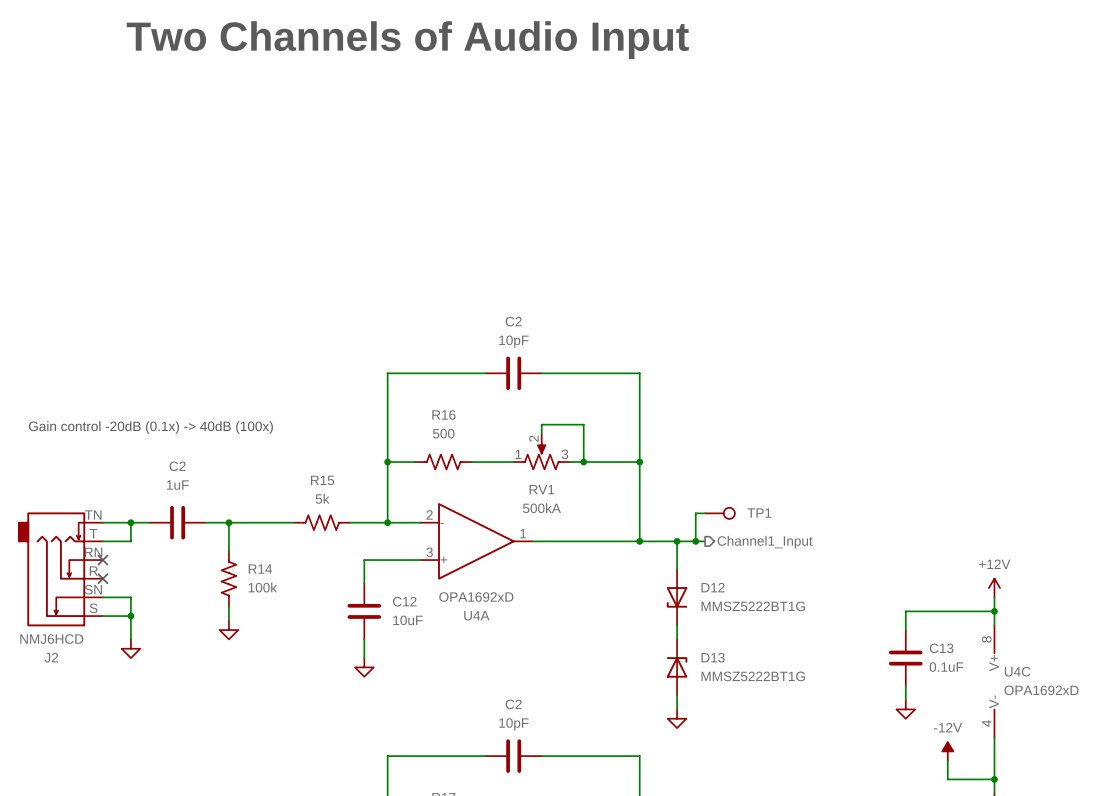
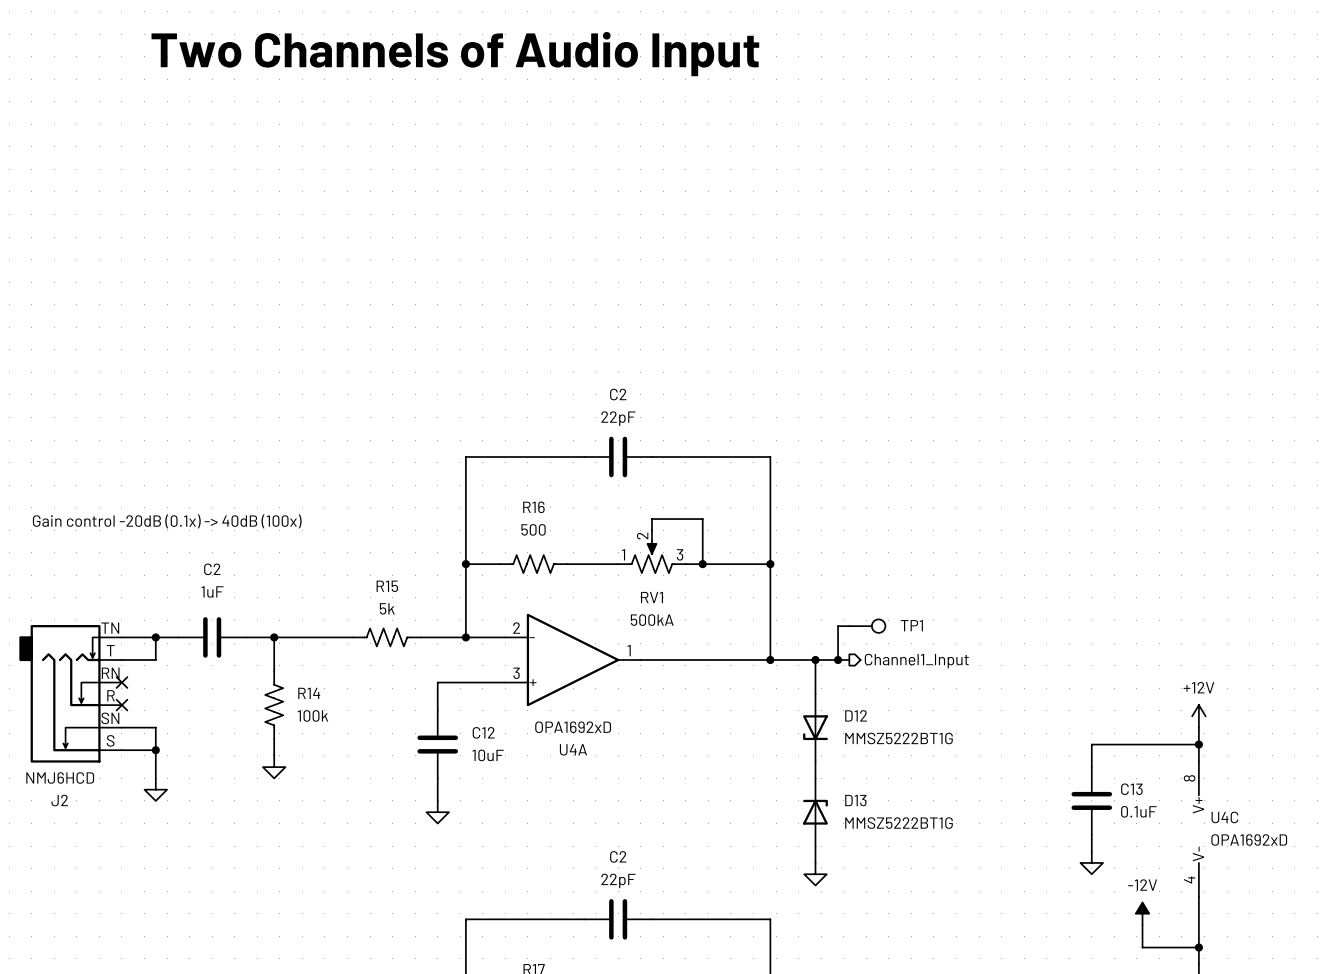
C2 value: 10pF (513, 341) -> 22pF (618, 418)
C2 value: 10pF (513, 724) -> 22pF (618, 880)

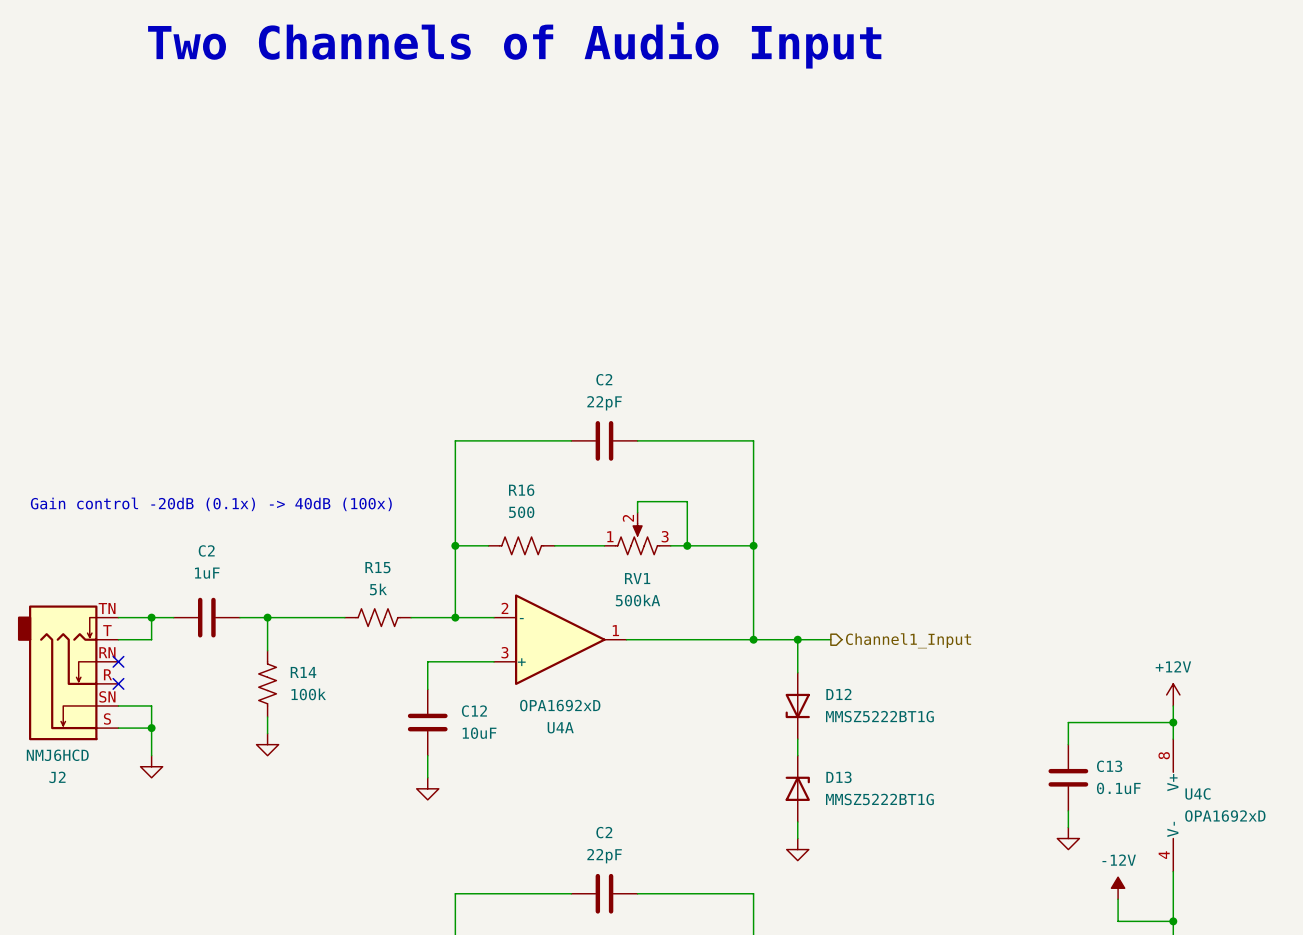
wire: (849, 626) (838, 626) (838, 659) -> none
TP1: (867, 626) -> none
junction: (838, 659) -> none

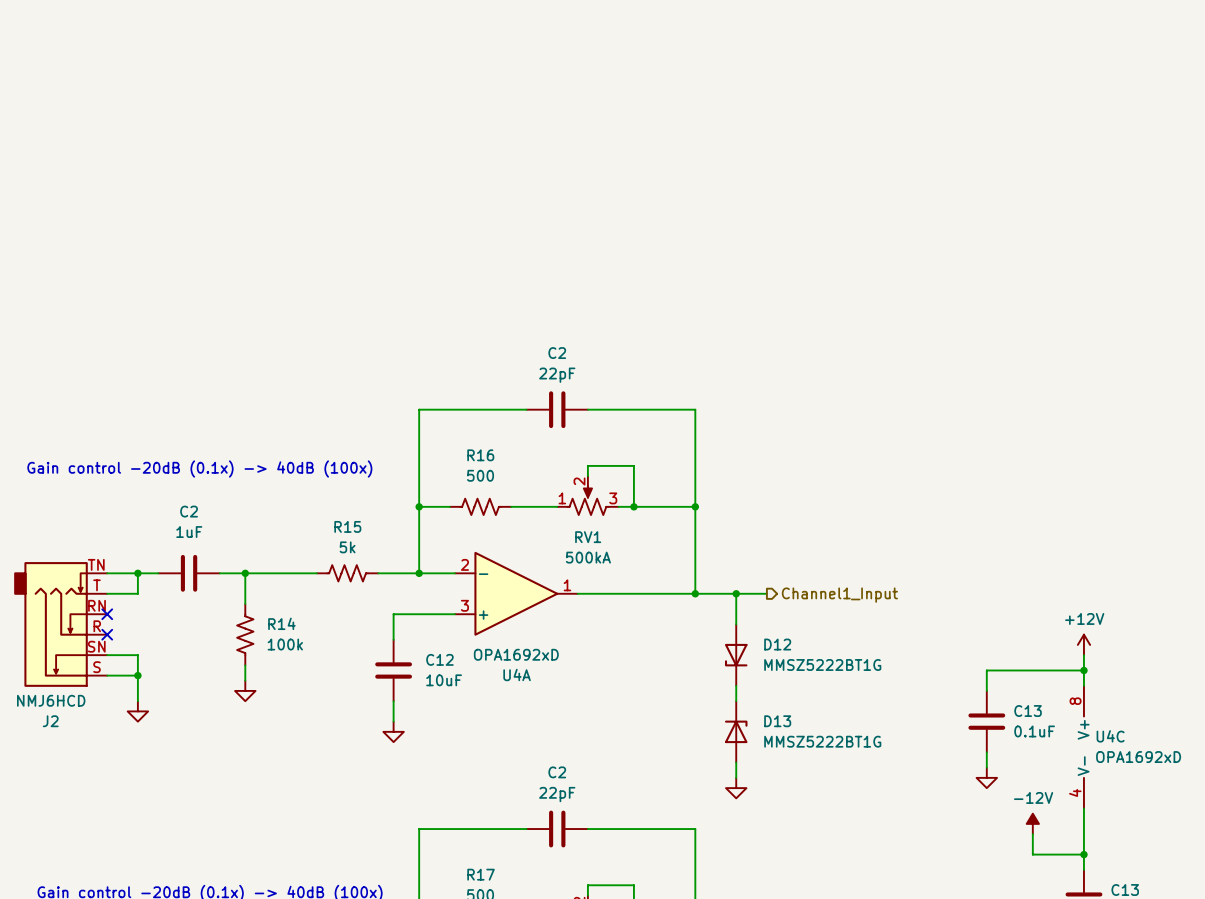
text: Two Channels of Audio Input (514, 45) -> none

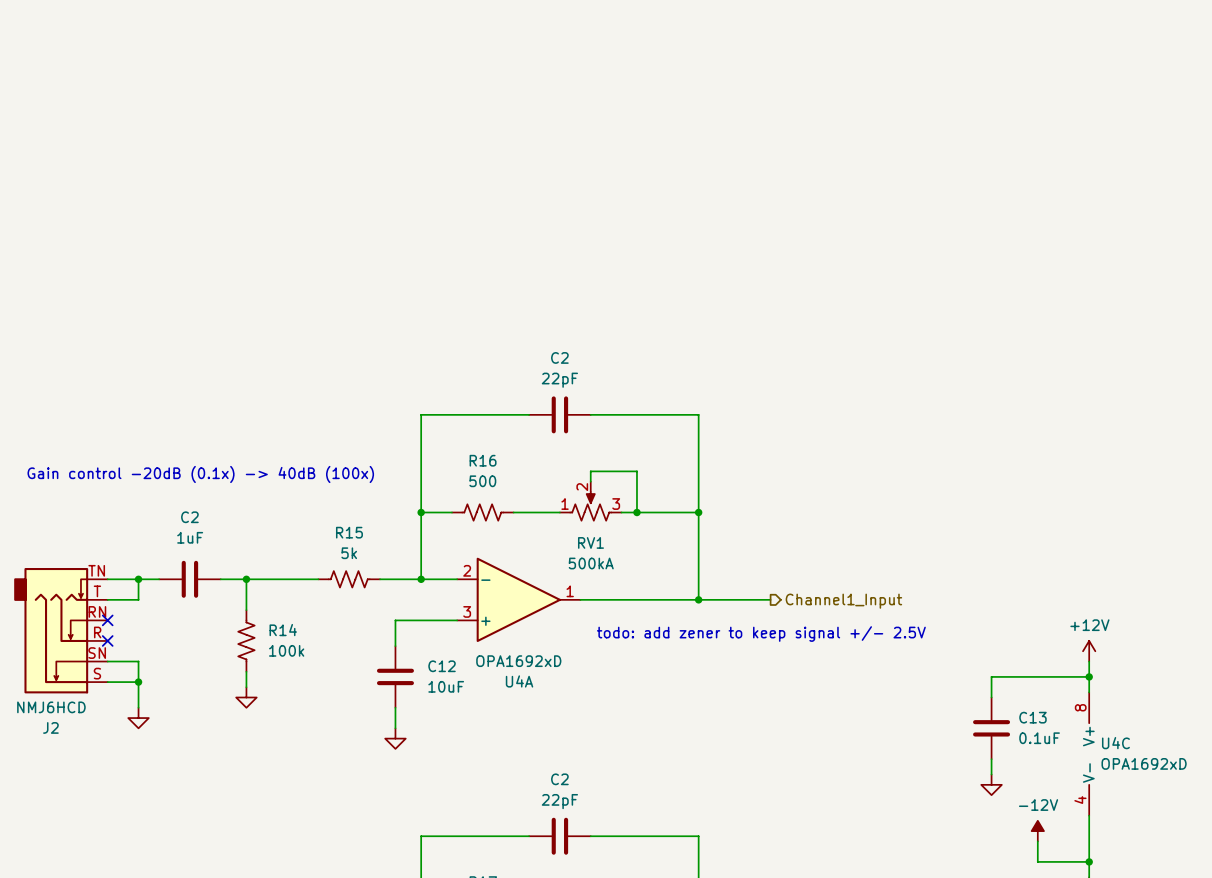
wire: (736, 593) (736, 624) -> none
junction: (736, 593) -> none
text: none -> todo: add zener to keep signal +/- 2.5V (761, 634)
D12: MMSZ5222BT1G (736, 655) -> none
wire: (736, 685) (736, 701) -> none
D13: MMSZ5222BT1G (736, 731) -> none
wire: (736, 762) (736, 777) -> none
power symbol: (736, 788) -> none

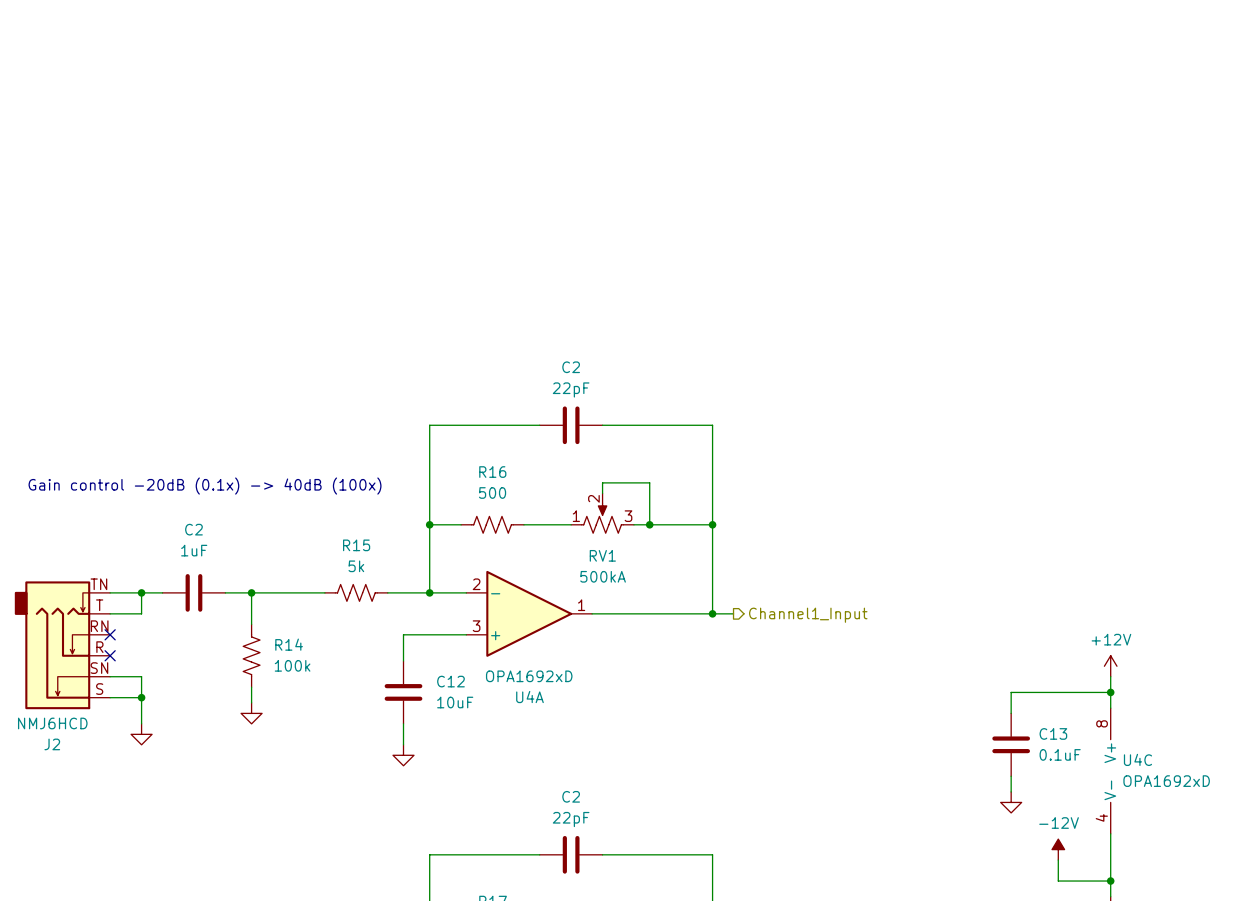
wire: (719, 599) (770, 599) -> none
hierarchical label position: Channel1_Input (843, 601) -> Channel1_Input (808, 615)
text: todo: add zener to keep signal +/- 2.5V (761, 634) -> none

